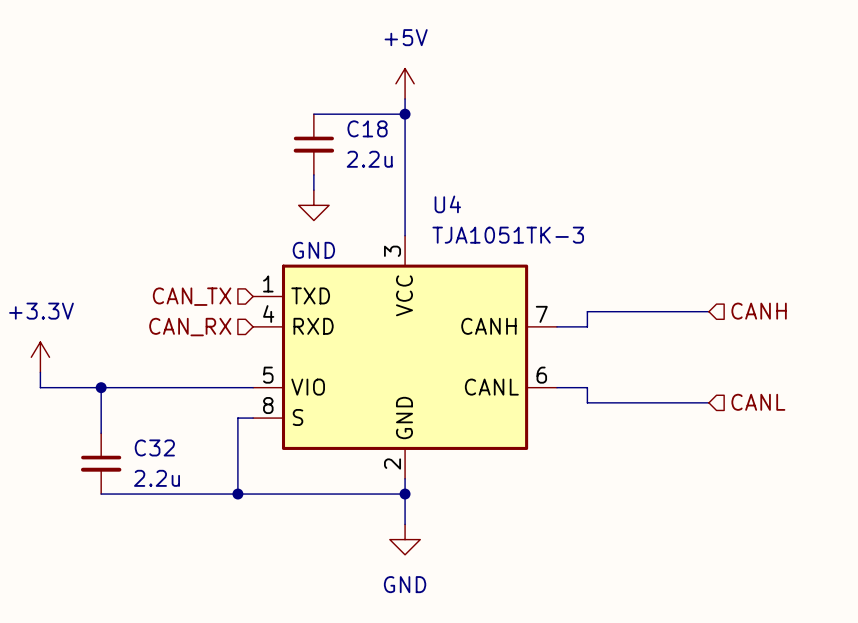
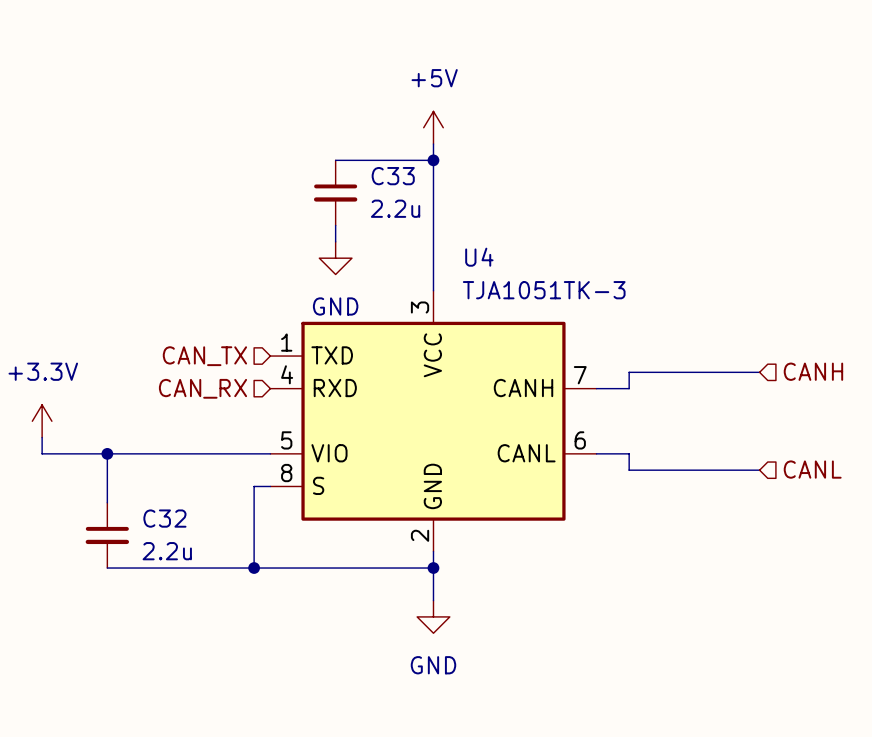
C18 name: C18 (367, 128) -> C33 (393, 176)

